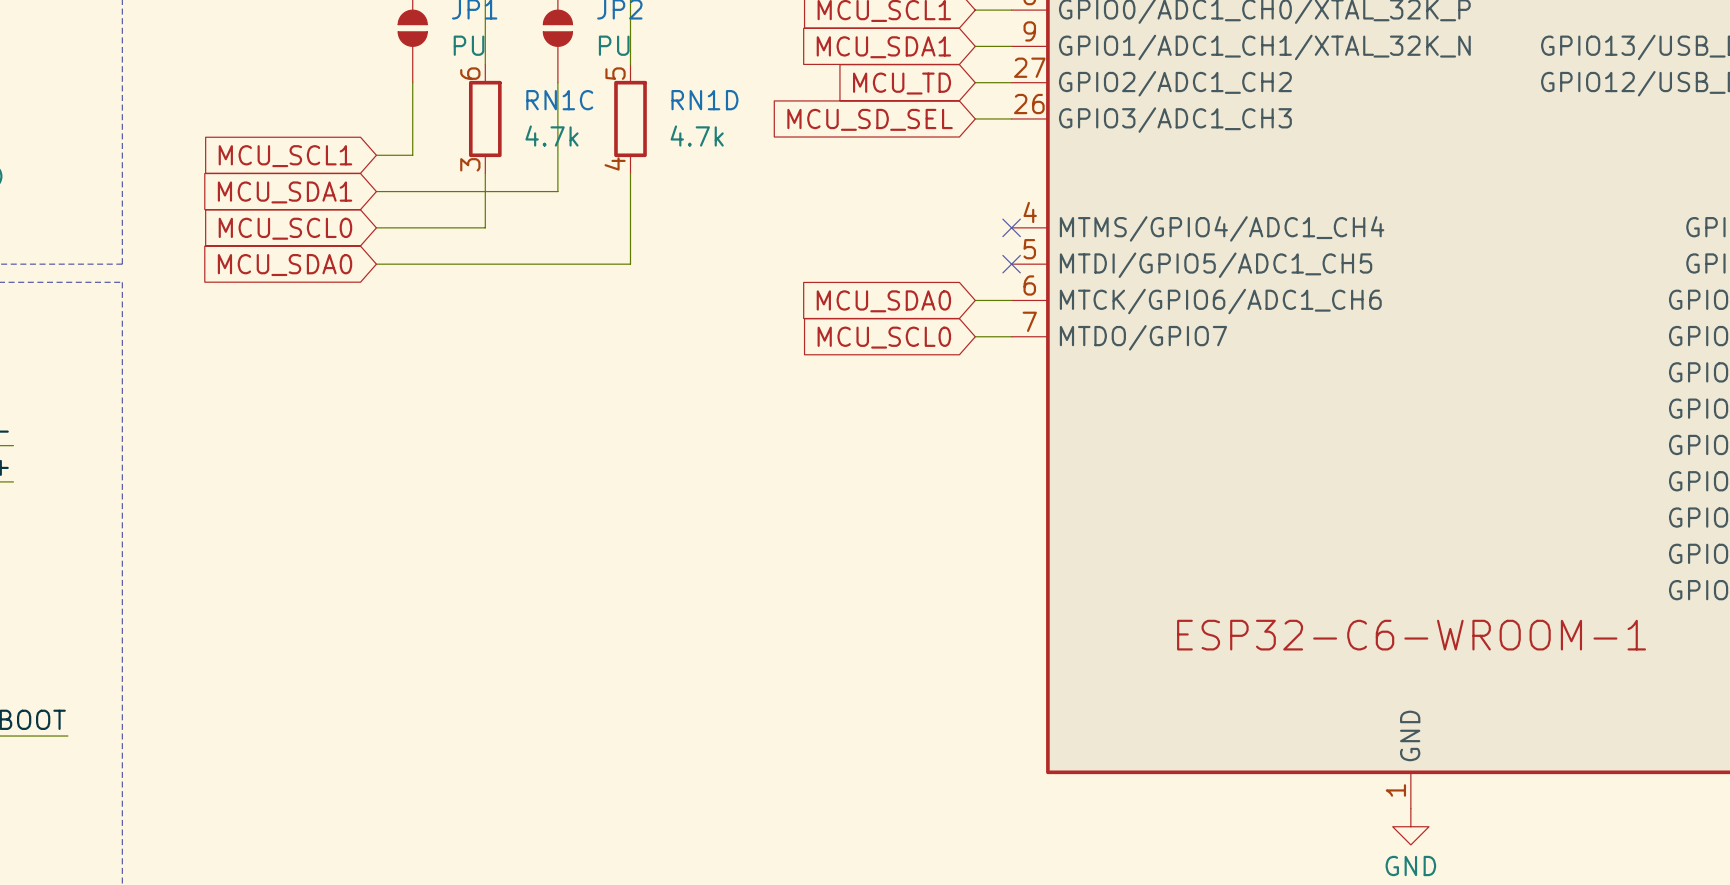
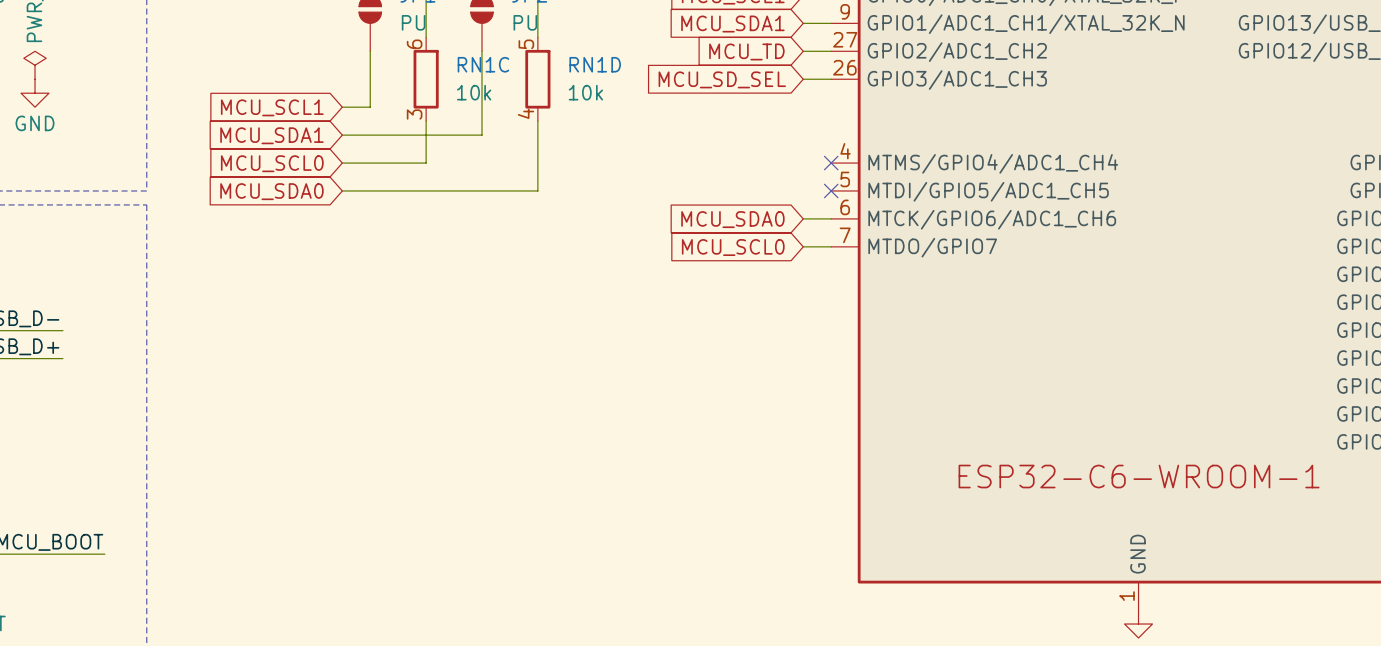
RN1C value: 4.7k (551, 136) -> 10k (474, 92)
RN1D value: 4.7k (697, 136) -> 10k (585, 92)

